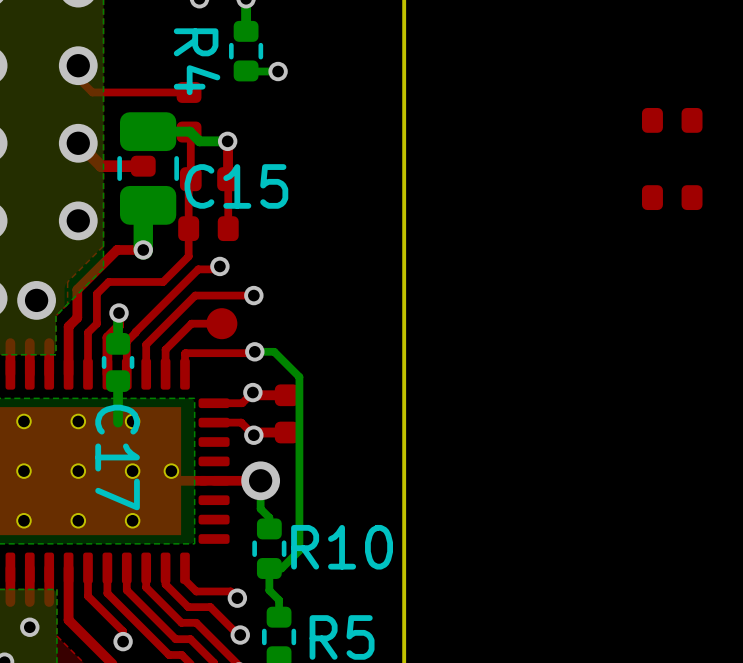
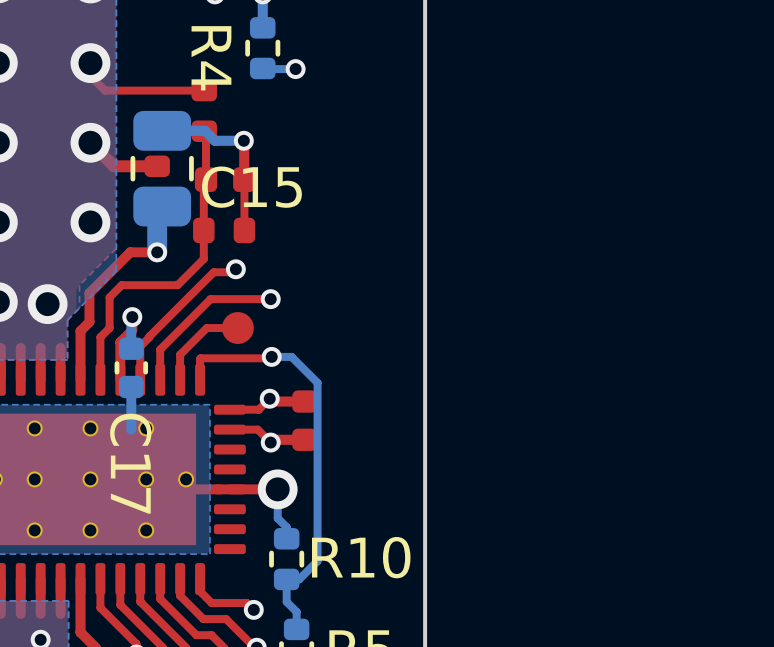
part: (672, 120) -> none
part: (672, 197) -> none

